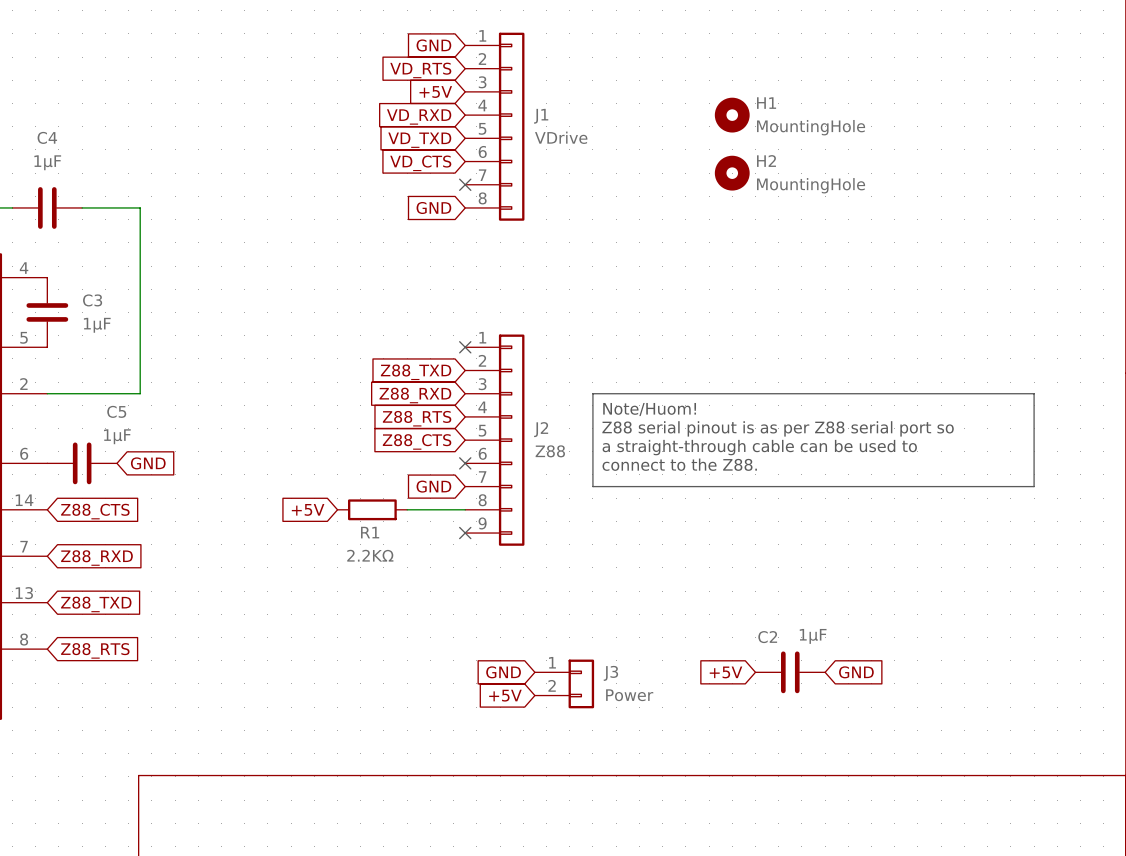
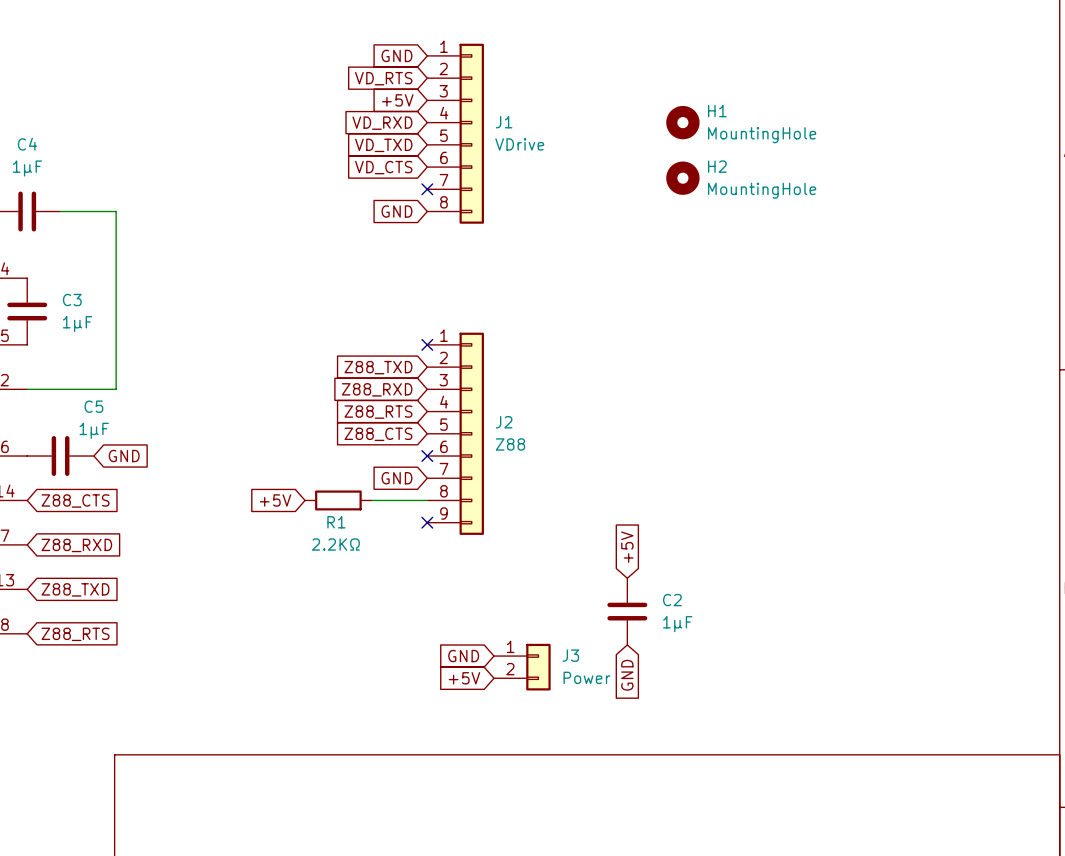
line: (592, 393) (1034, 393) (1034, 486) (592, 486) (592, 393) -> none
text: Note/Huom! (649, 409) -> none
text: Z88 serial pinout is as per Z88 serial port so (778, 428) -> none
text: a straight-through cable can be used to (759, 447) -> none
text: connect to the Z88. (679, 464) -> none
C2 value position: 1µF (813, 636) -> 1µF (677, 624)
C2 name position: C2 (767, 637) -> C2 (672, 600)
global label rotation: 0° (726, 672) -> 90° clockwise (627, 547)
global label position: +5V (726, 672) -> +5V (627, 547)
C2 rotation: 0° (790, 672) -> 90° clockwise (627, 611)
C2 position: (790, 672) -> (627, 611)
global label rotation: 0° (856, 672) -> 90° clockwise (627, 675)
global label position: GND (856, 672) -> GND (627, 675)

